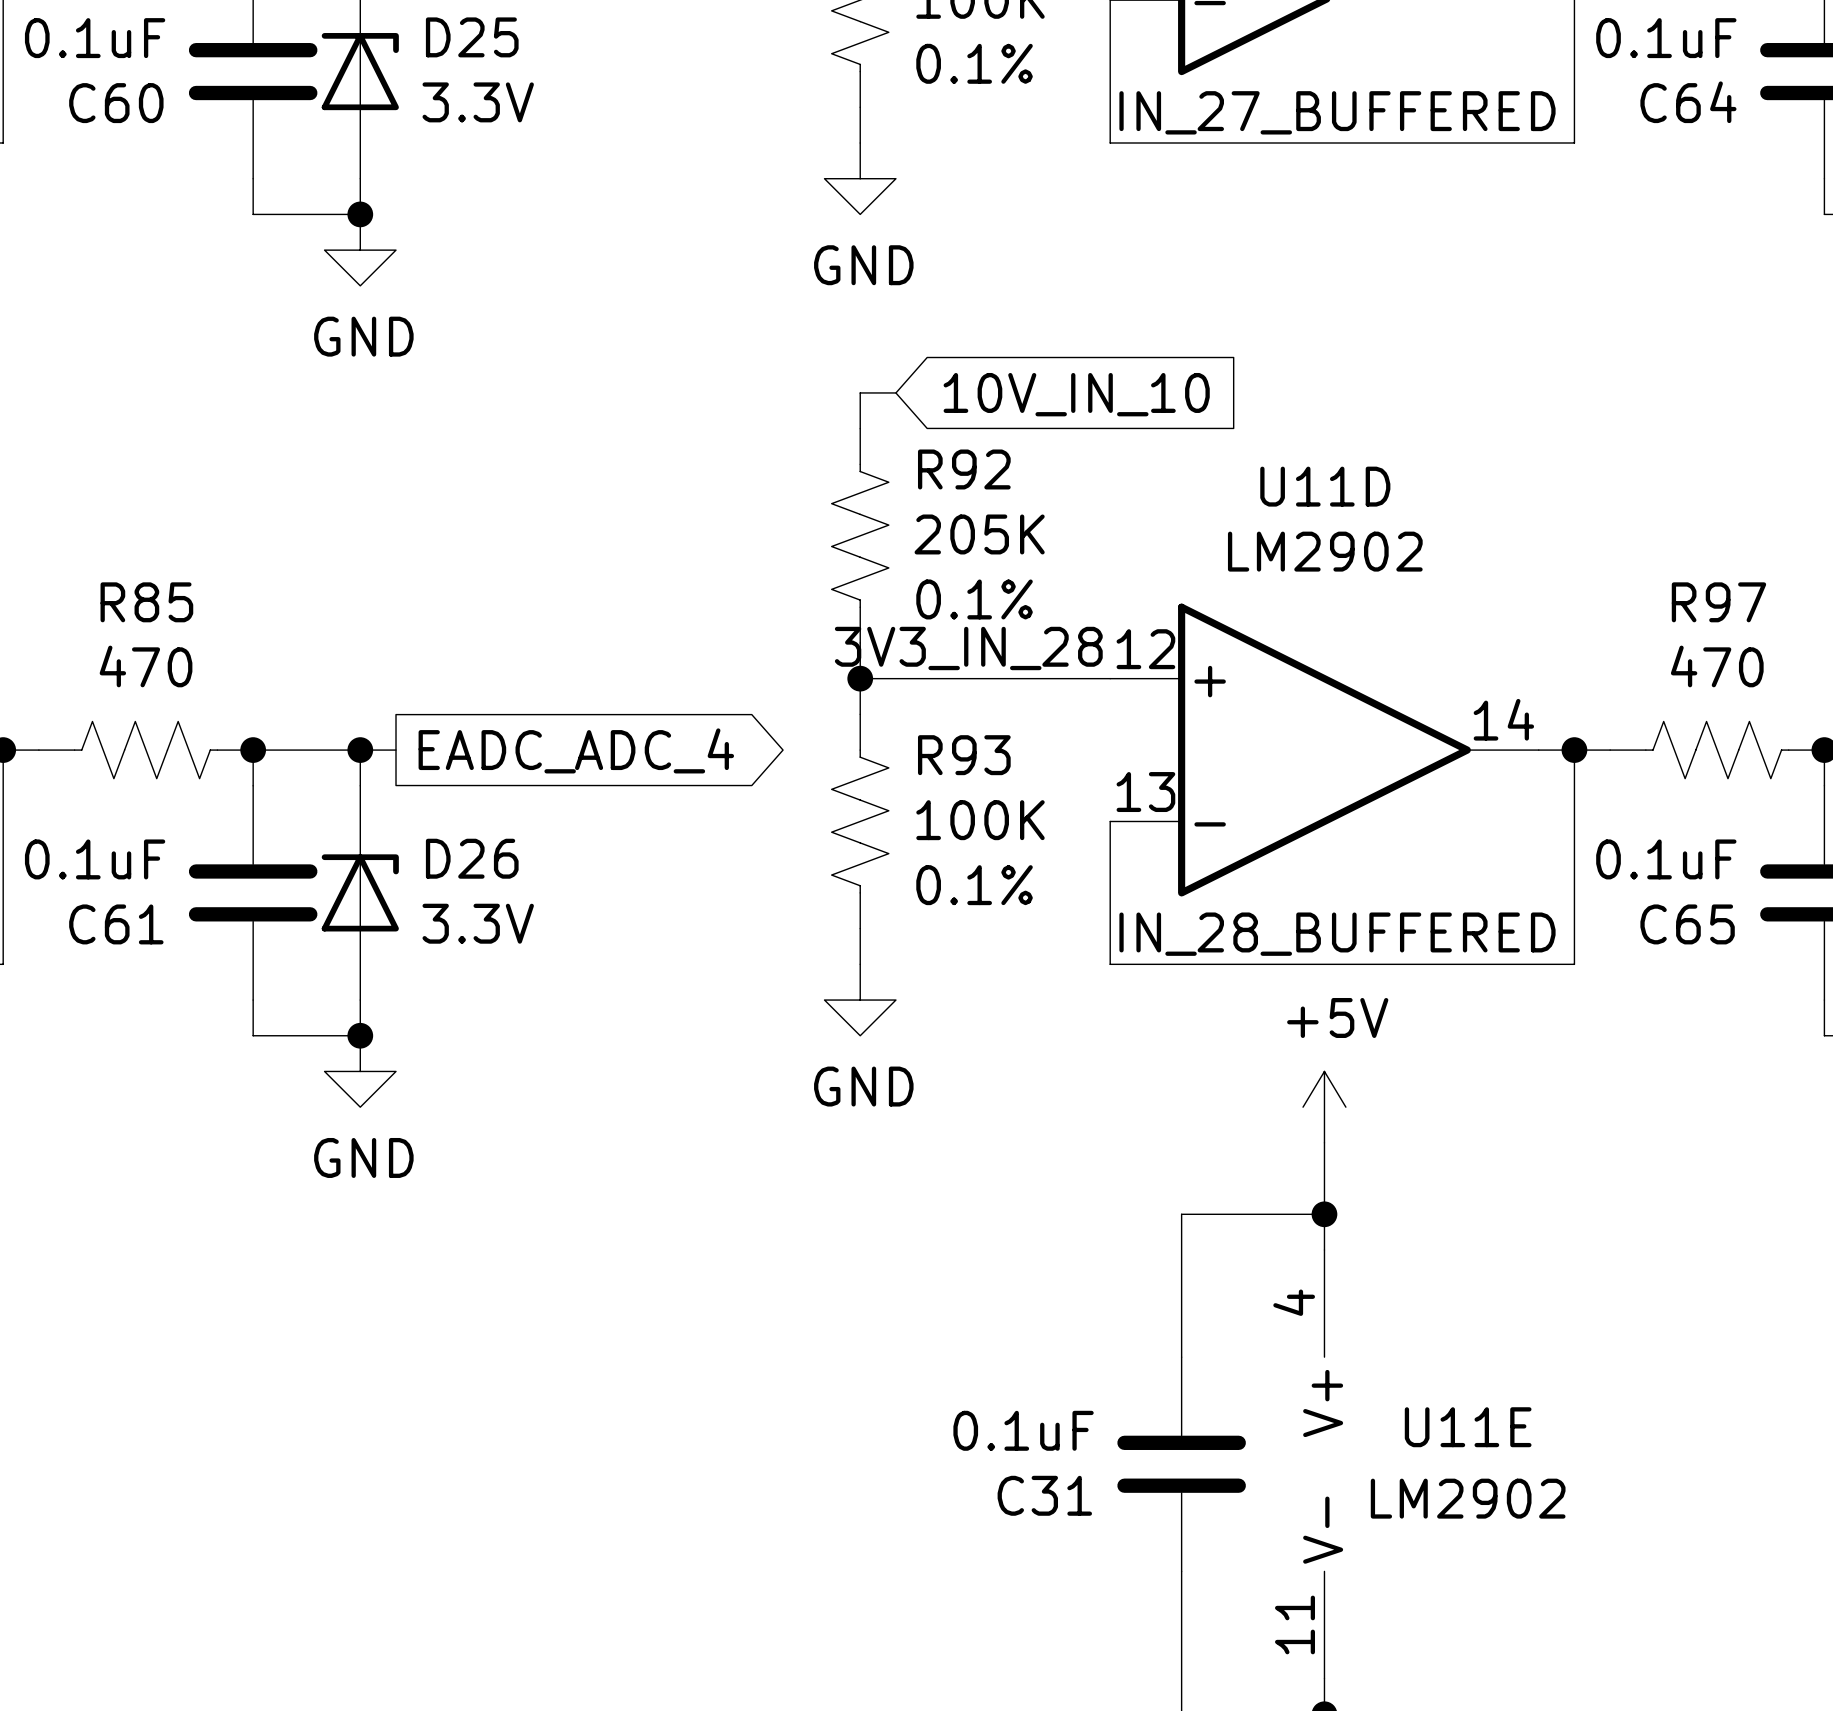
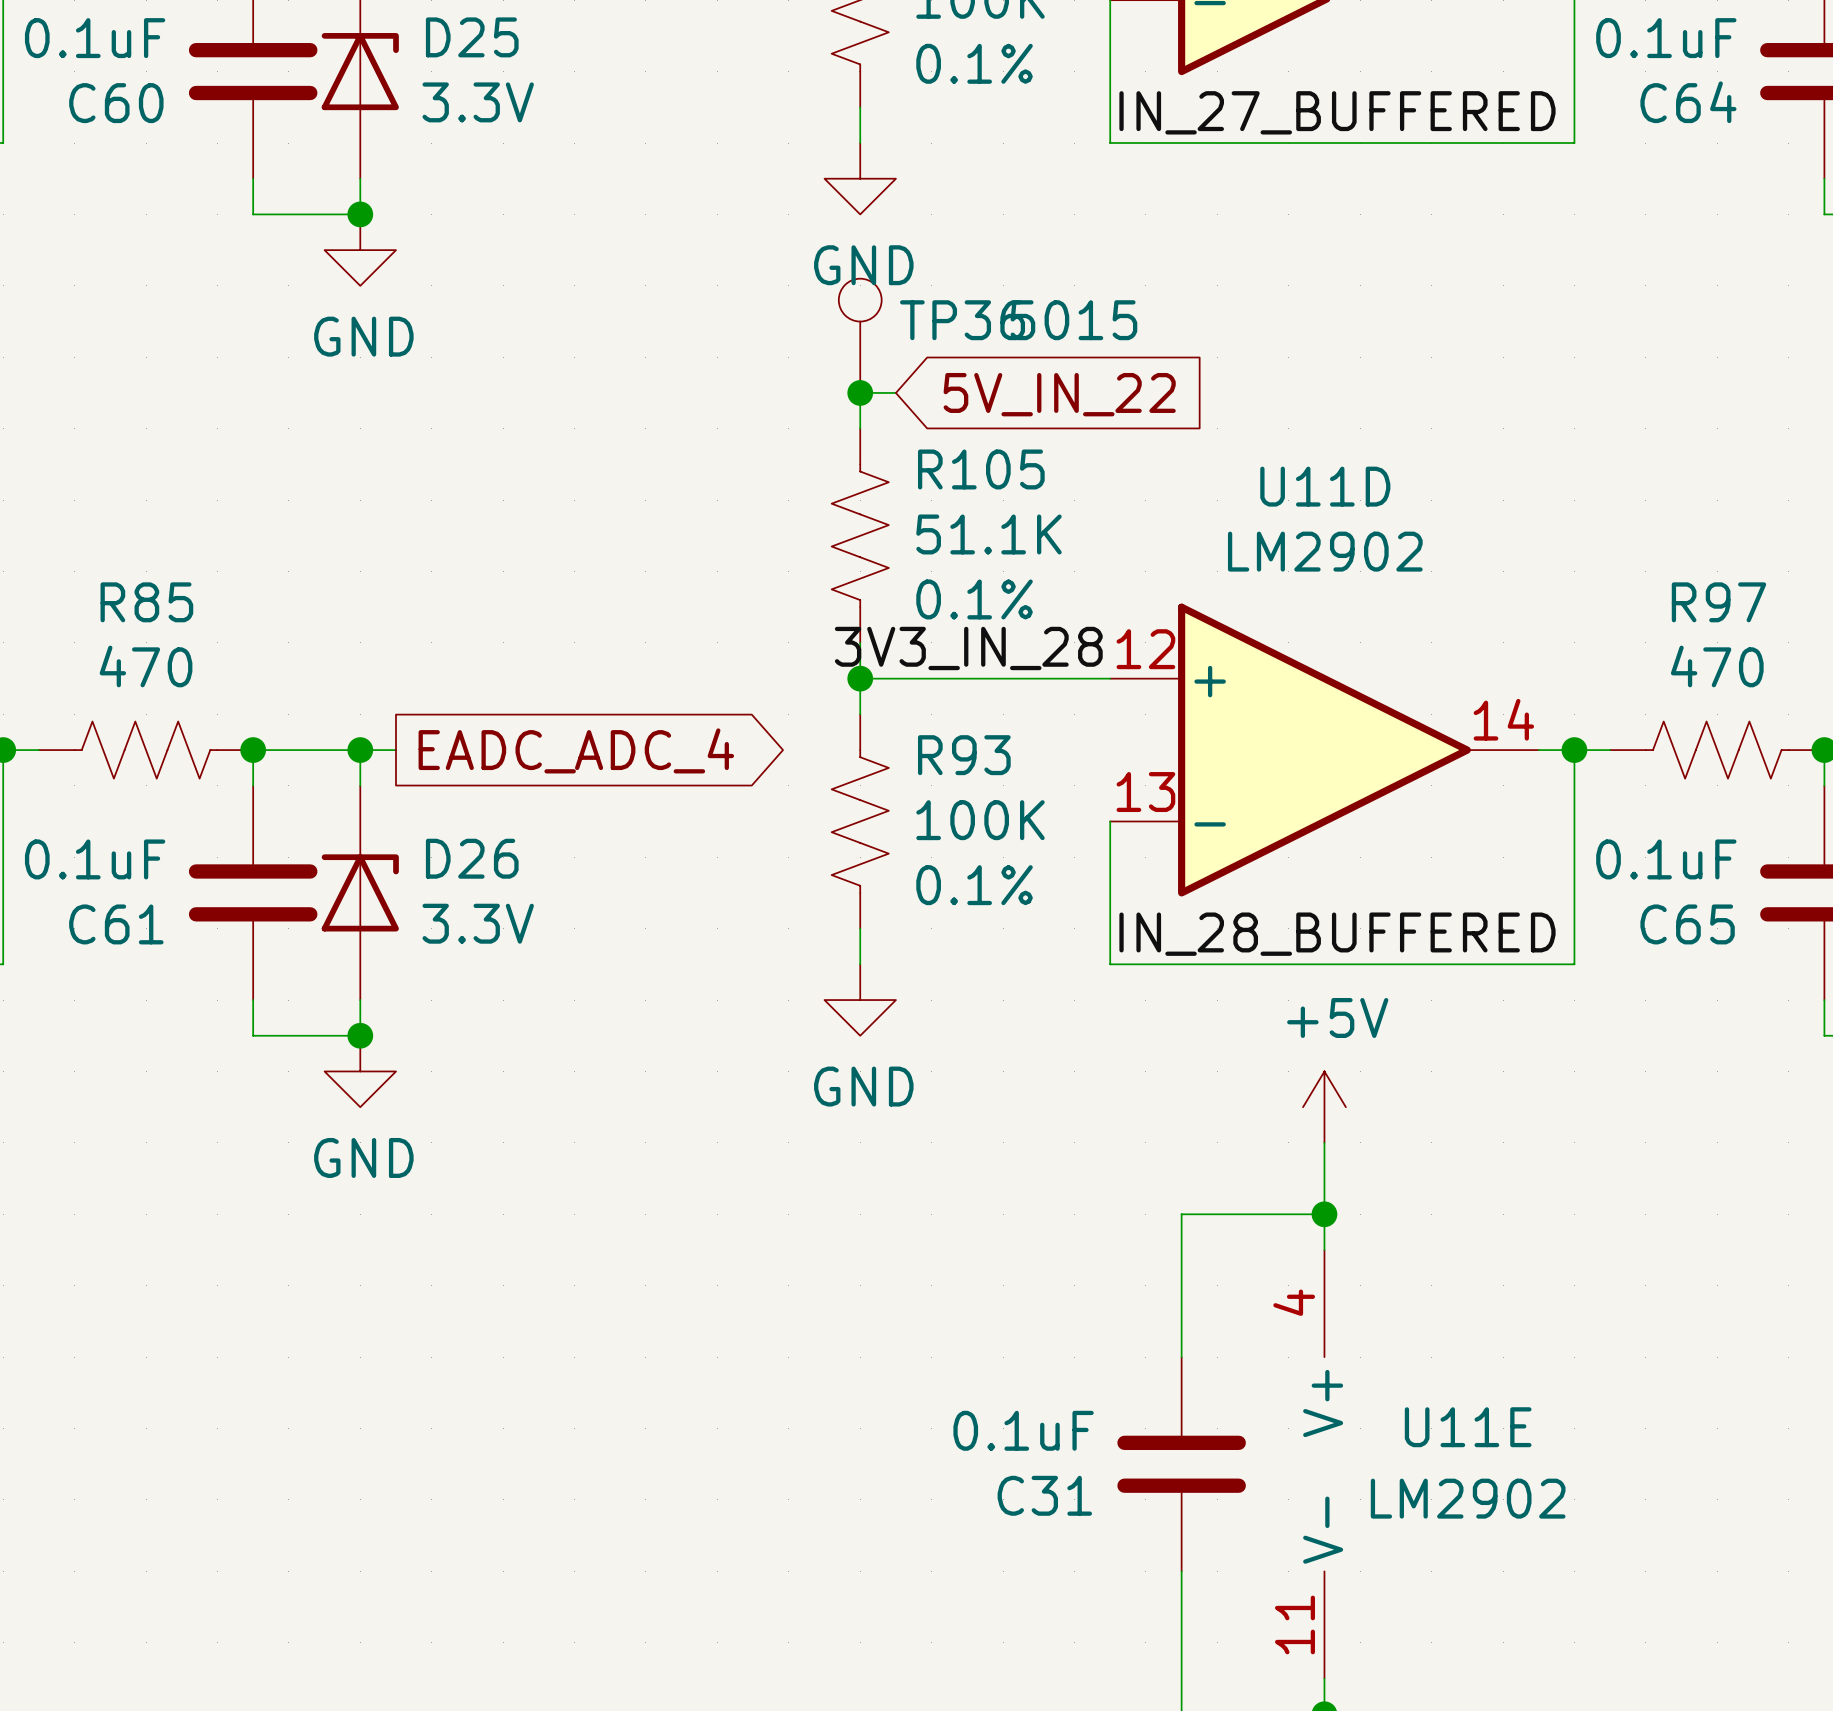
TP36: none -> 5015 (860, 335)
junction: none -> (860, 392)
global label: 10V_IN_10 (1076, 394) -> 5V_IN_22 (1059, 394)
R92 name: R92 (964, 469) -> R105 (981, 469)
R92 value: 205K (979, 534) -> 51.1K (988, 534)

